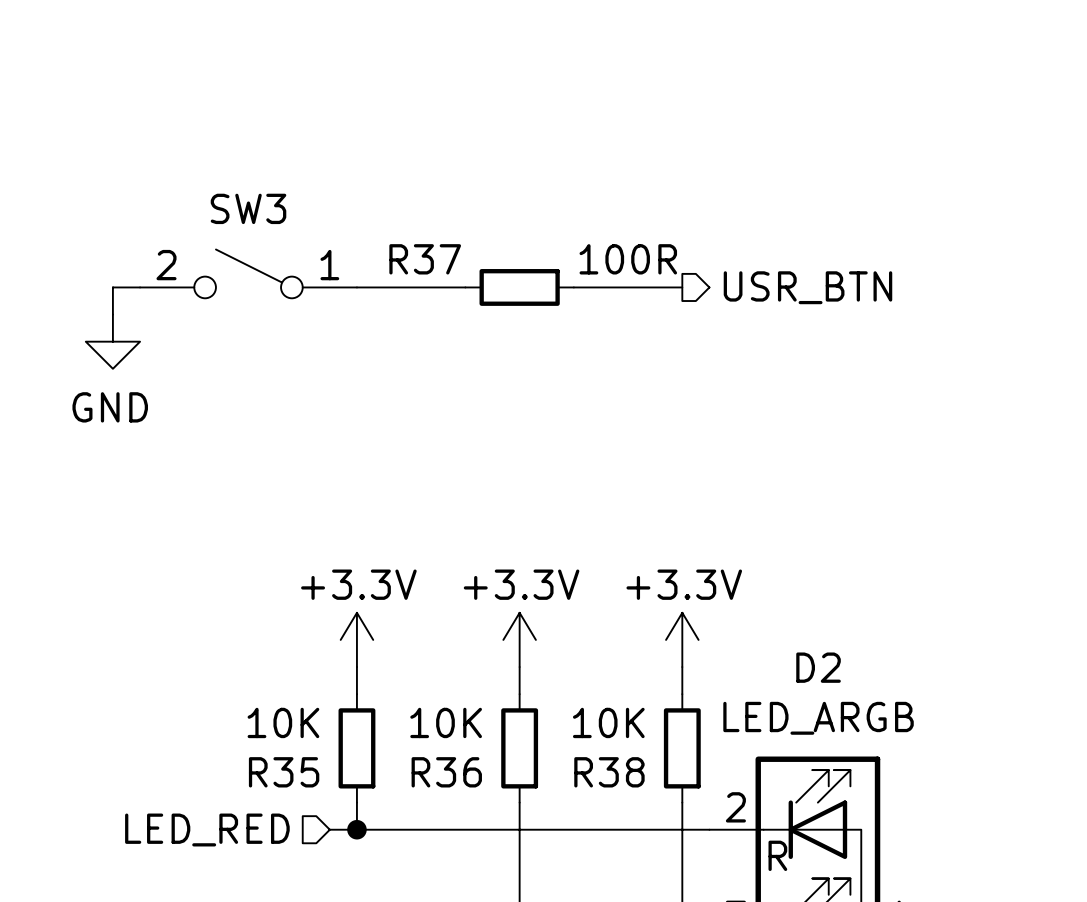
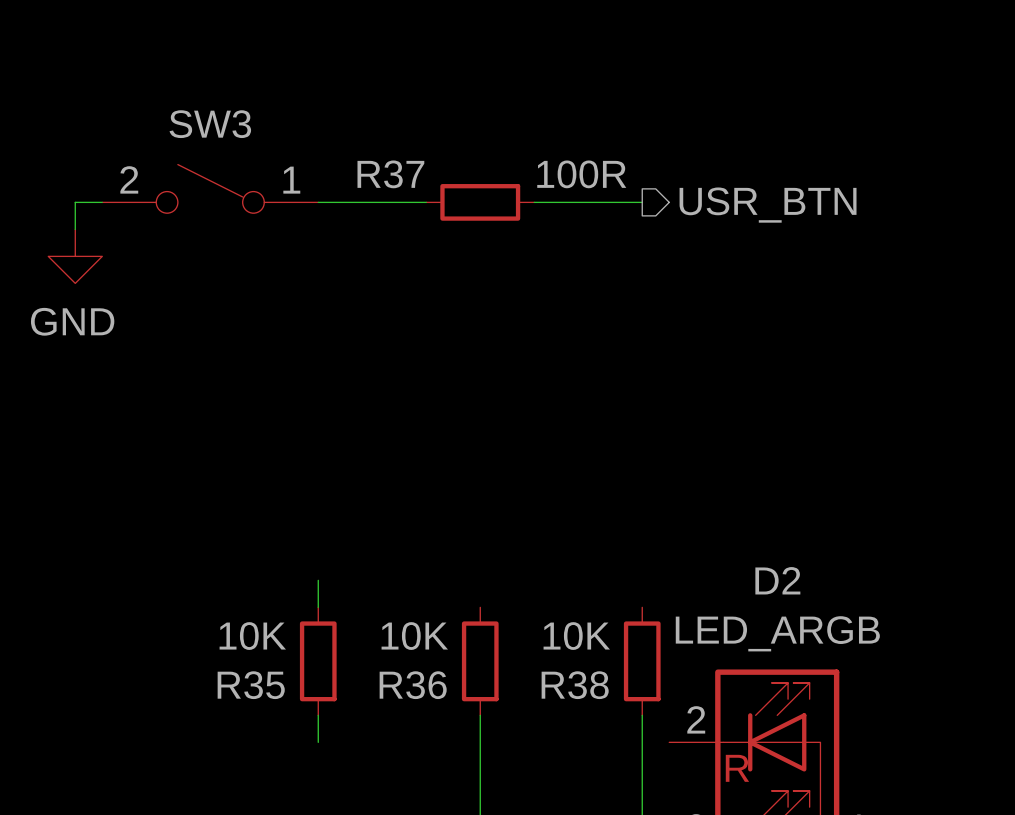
power symbol: +3.3V (356, 639) -> none
power symbol: +3.3V (519, 639) -> none
power symbol: +3.3V (682, 639) -> none
wire: (519, 667) (519, 694) -> none
wire: (682, 667) (682, 694) -> none
wire: (329, 829) (709, 829) -> none
junction: (356, 829) -> none
hierarchical label: LED_RED (207, 830) -> none

